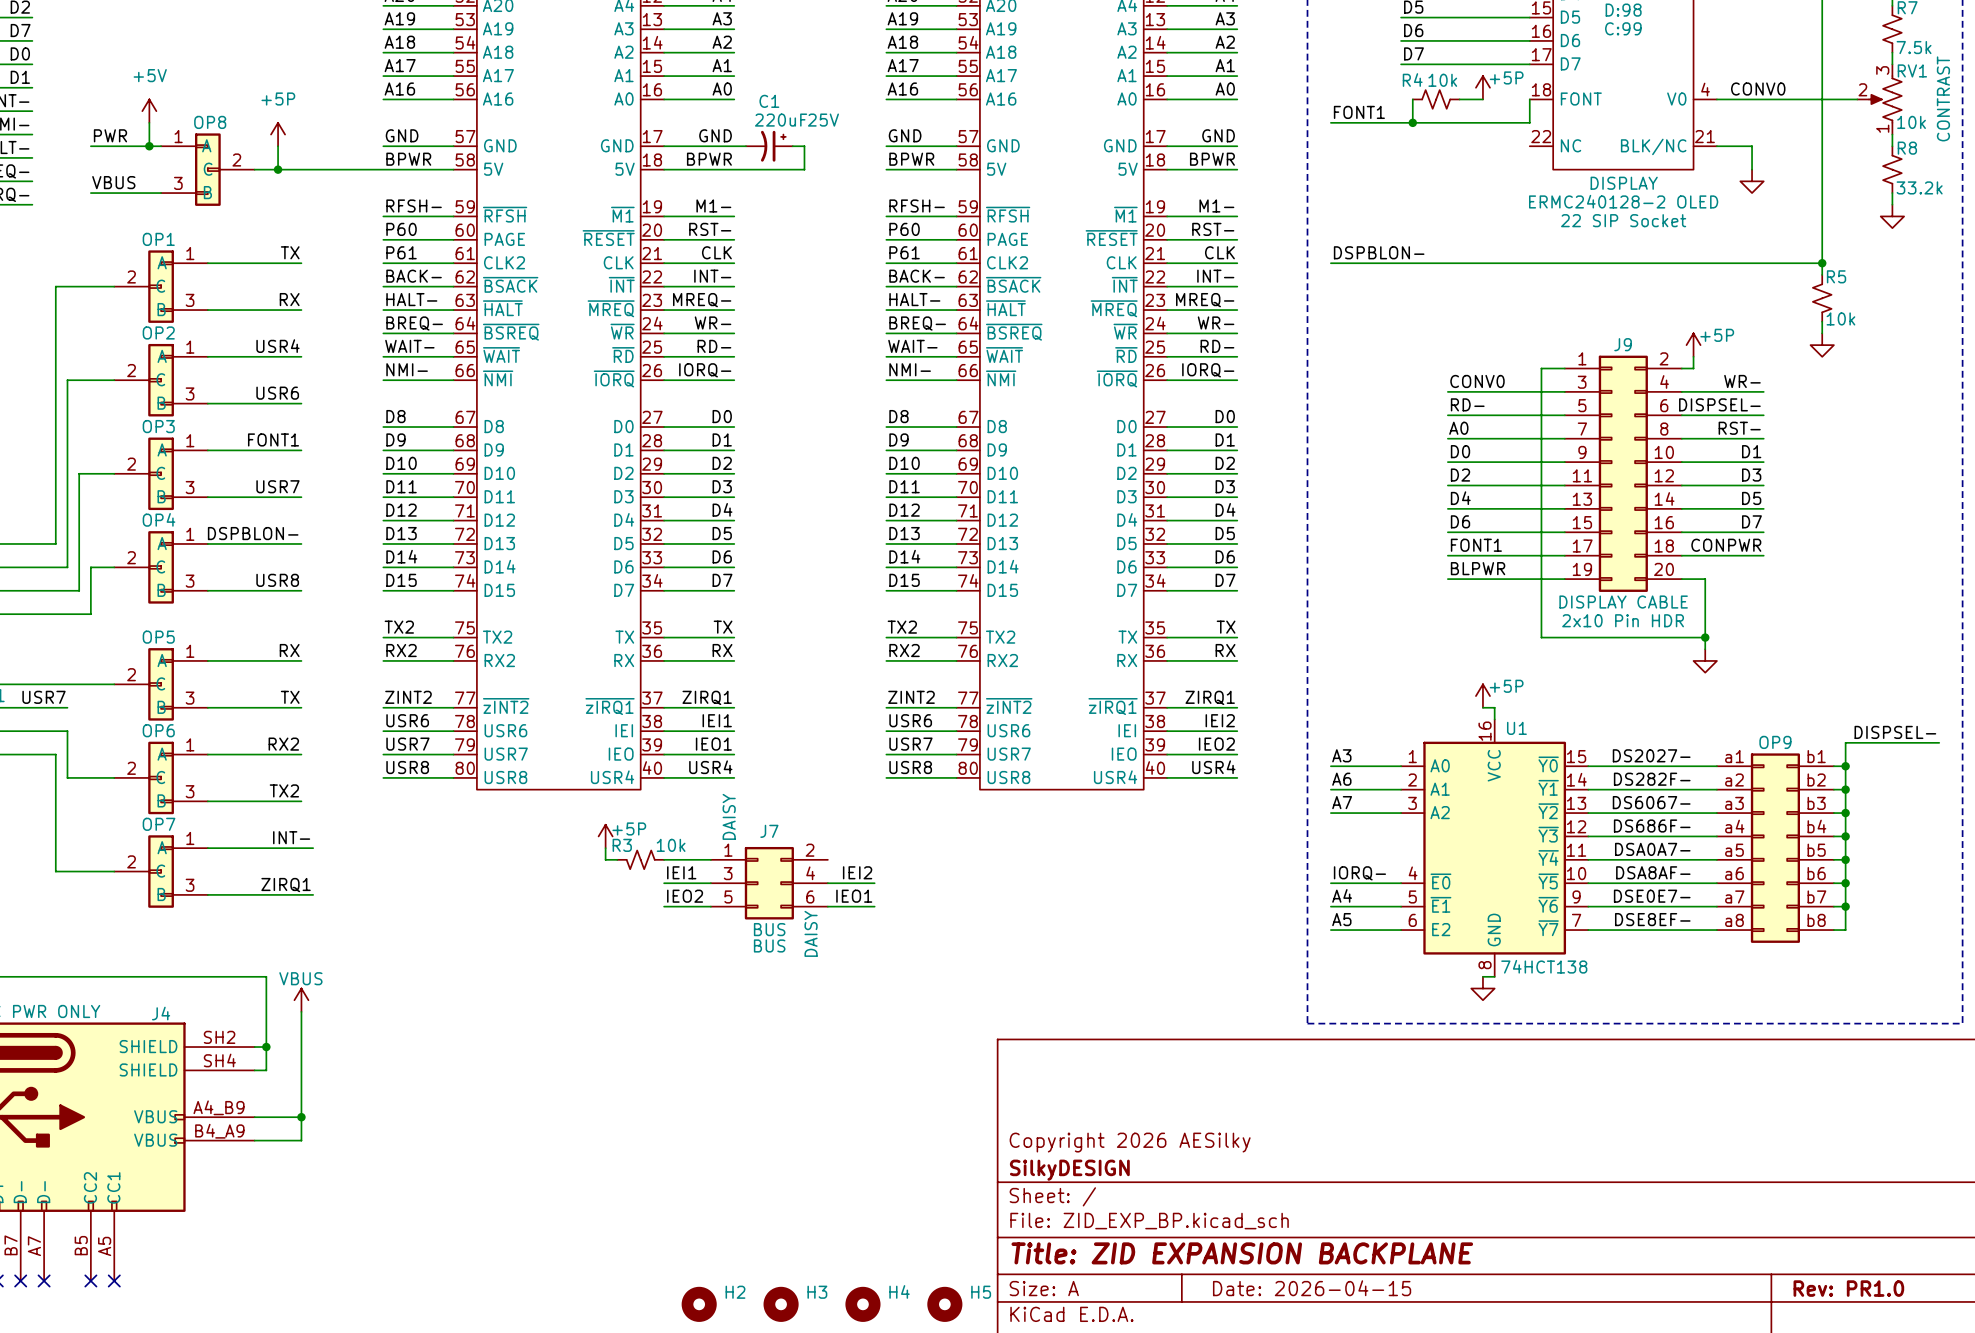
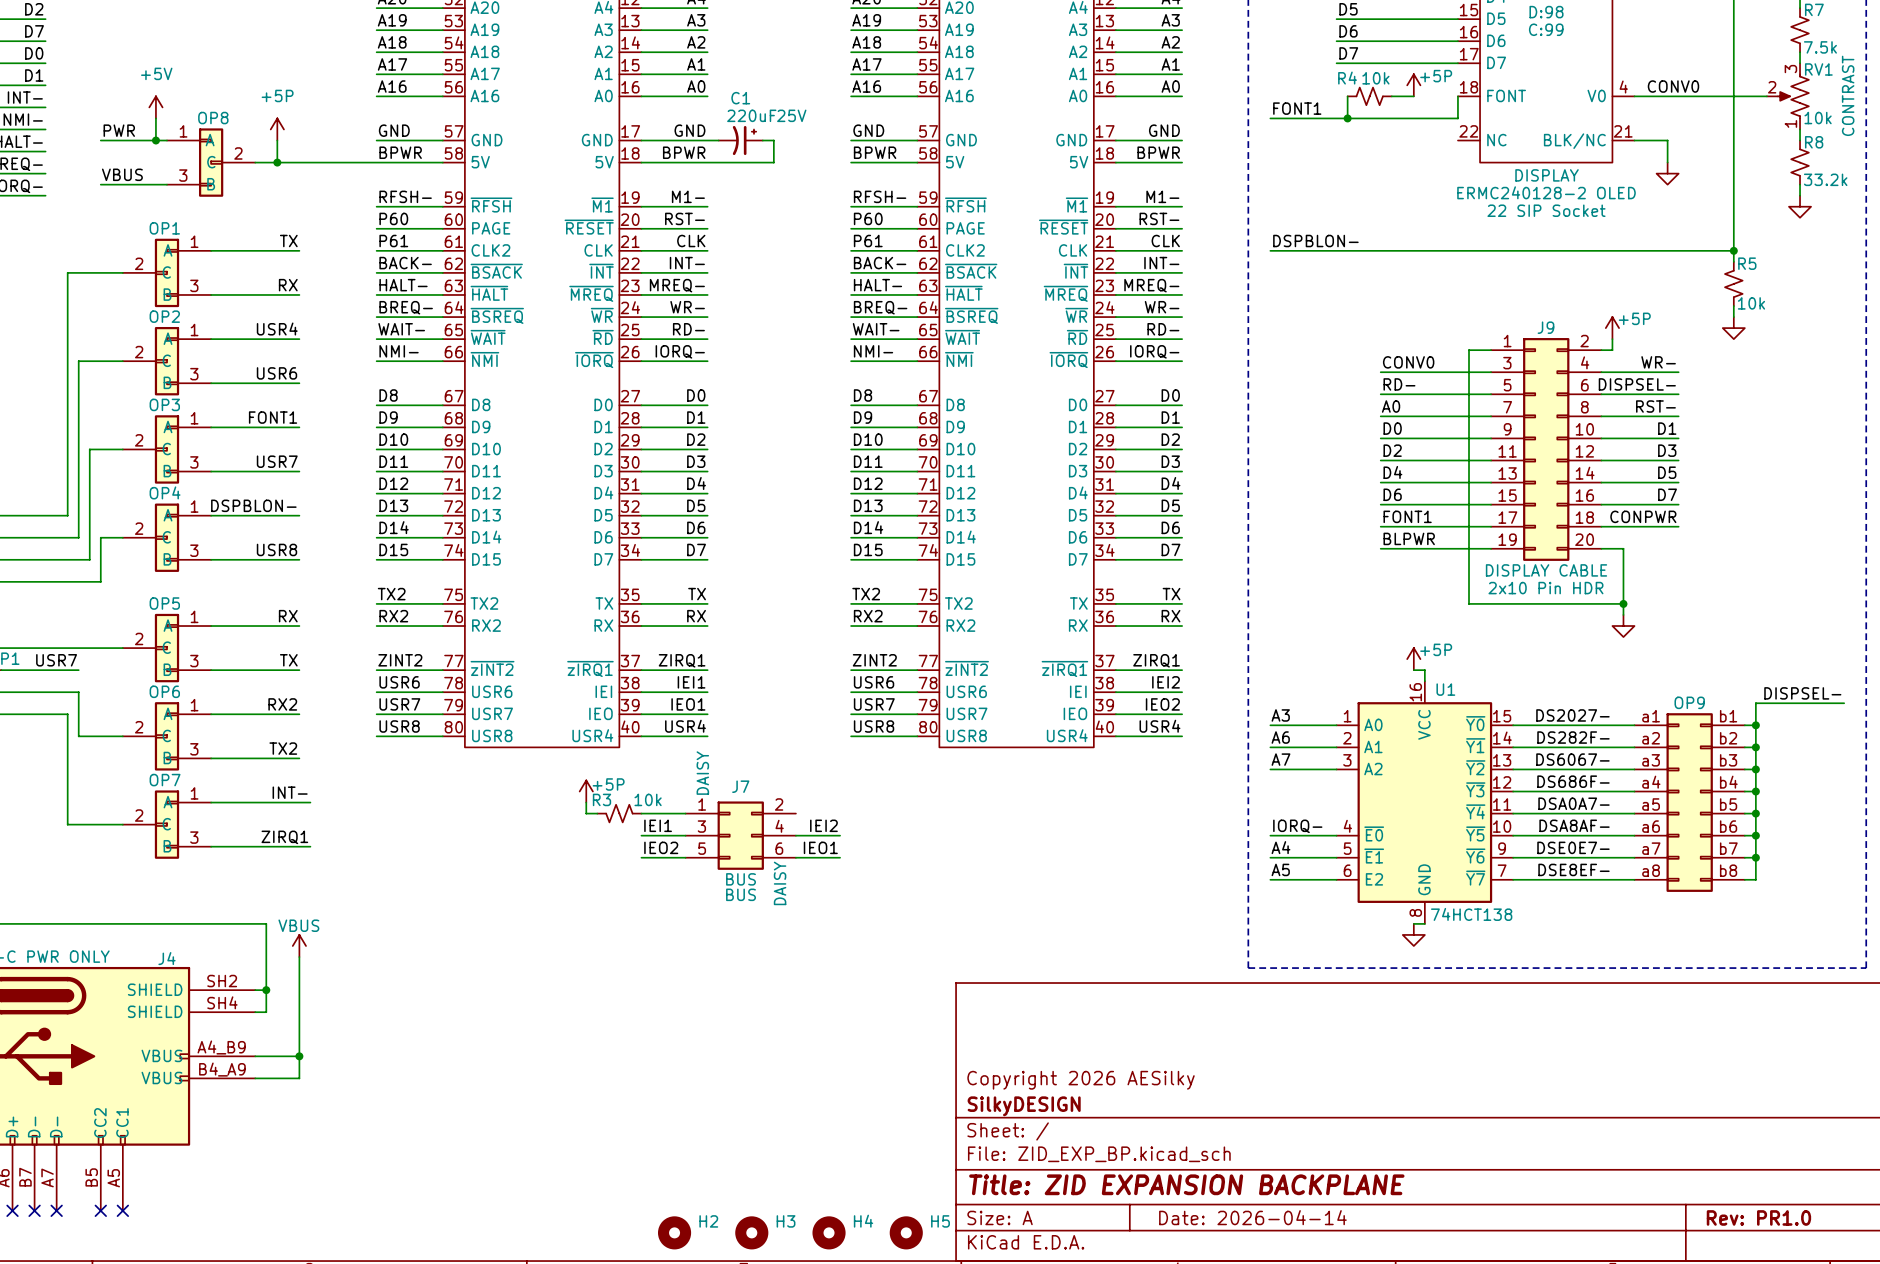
title block: Date: 2026-04-15 (1312, 1288) -> Date: 2026-04-14 (1252, 1217)

